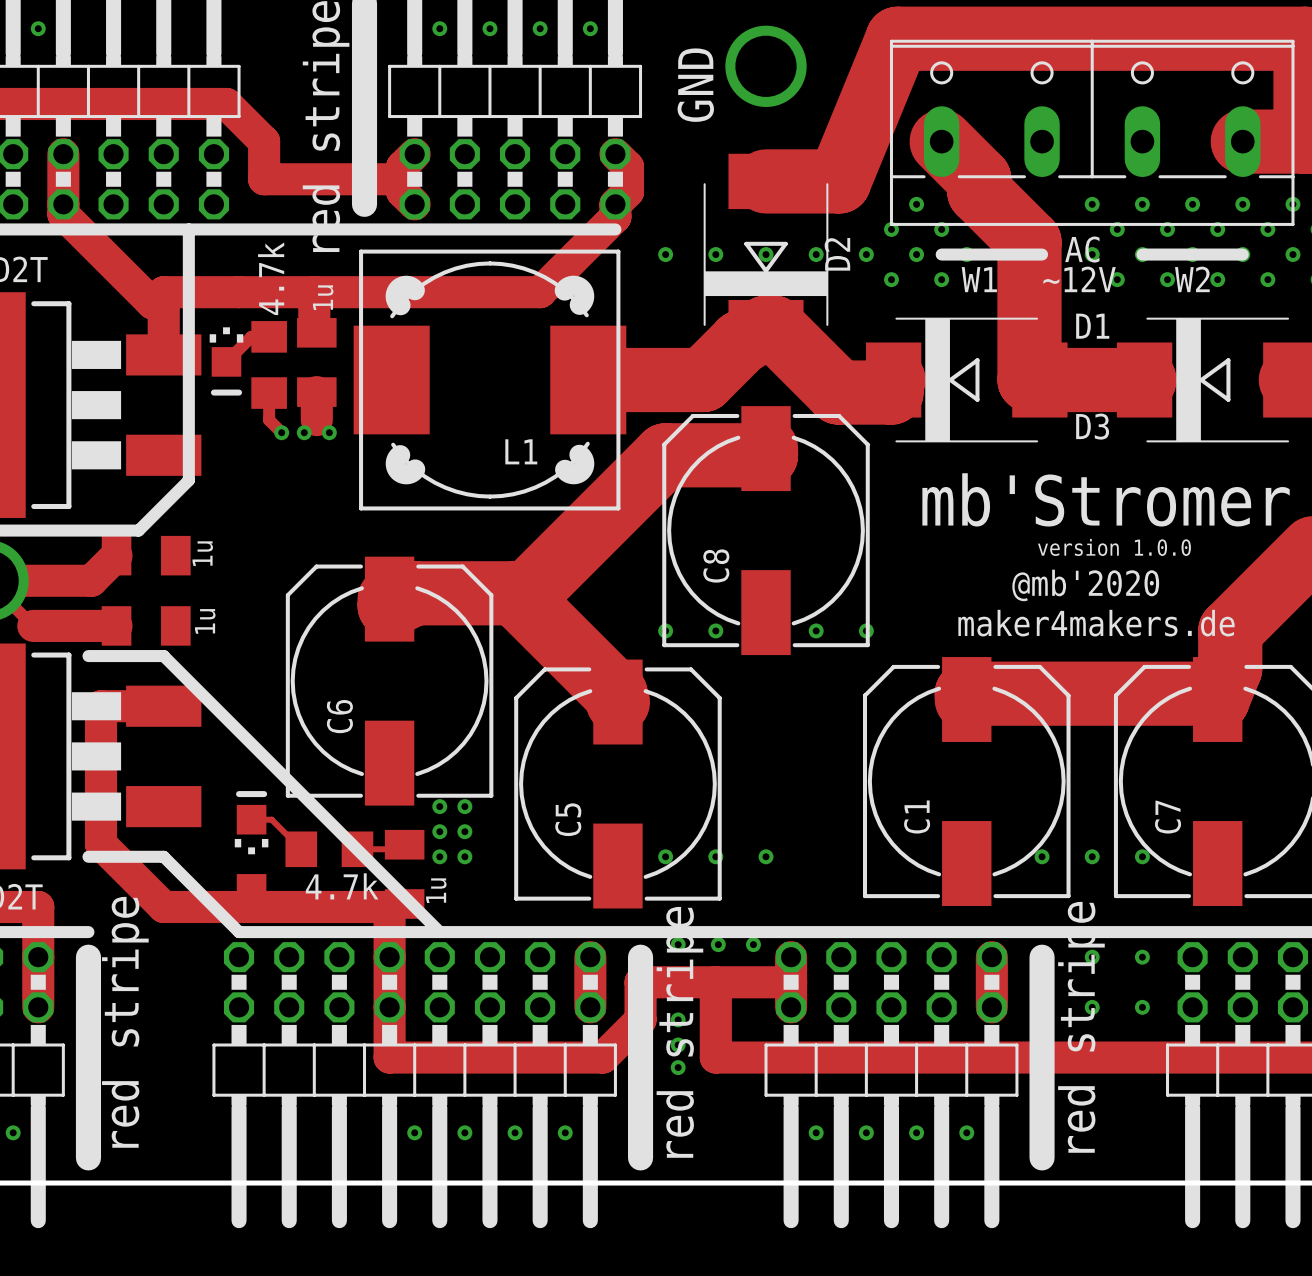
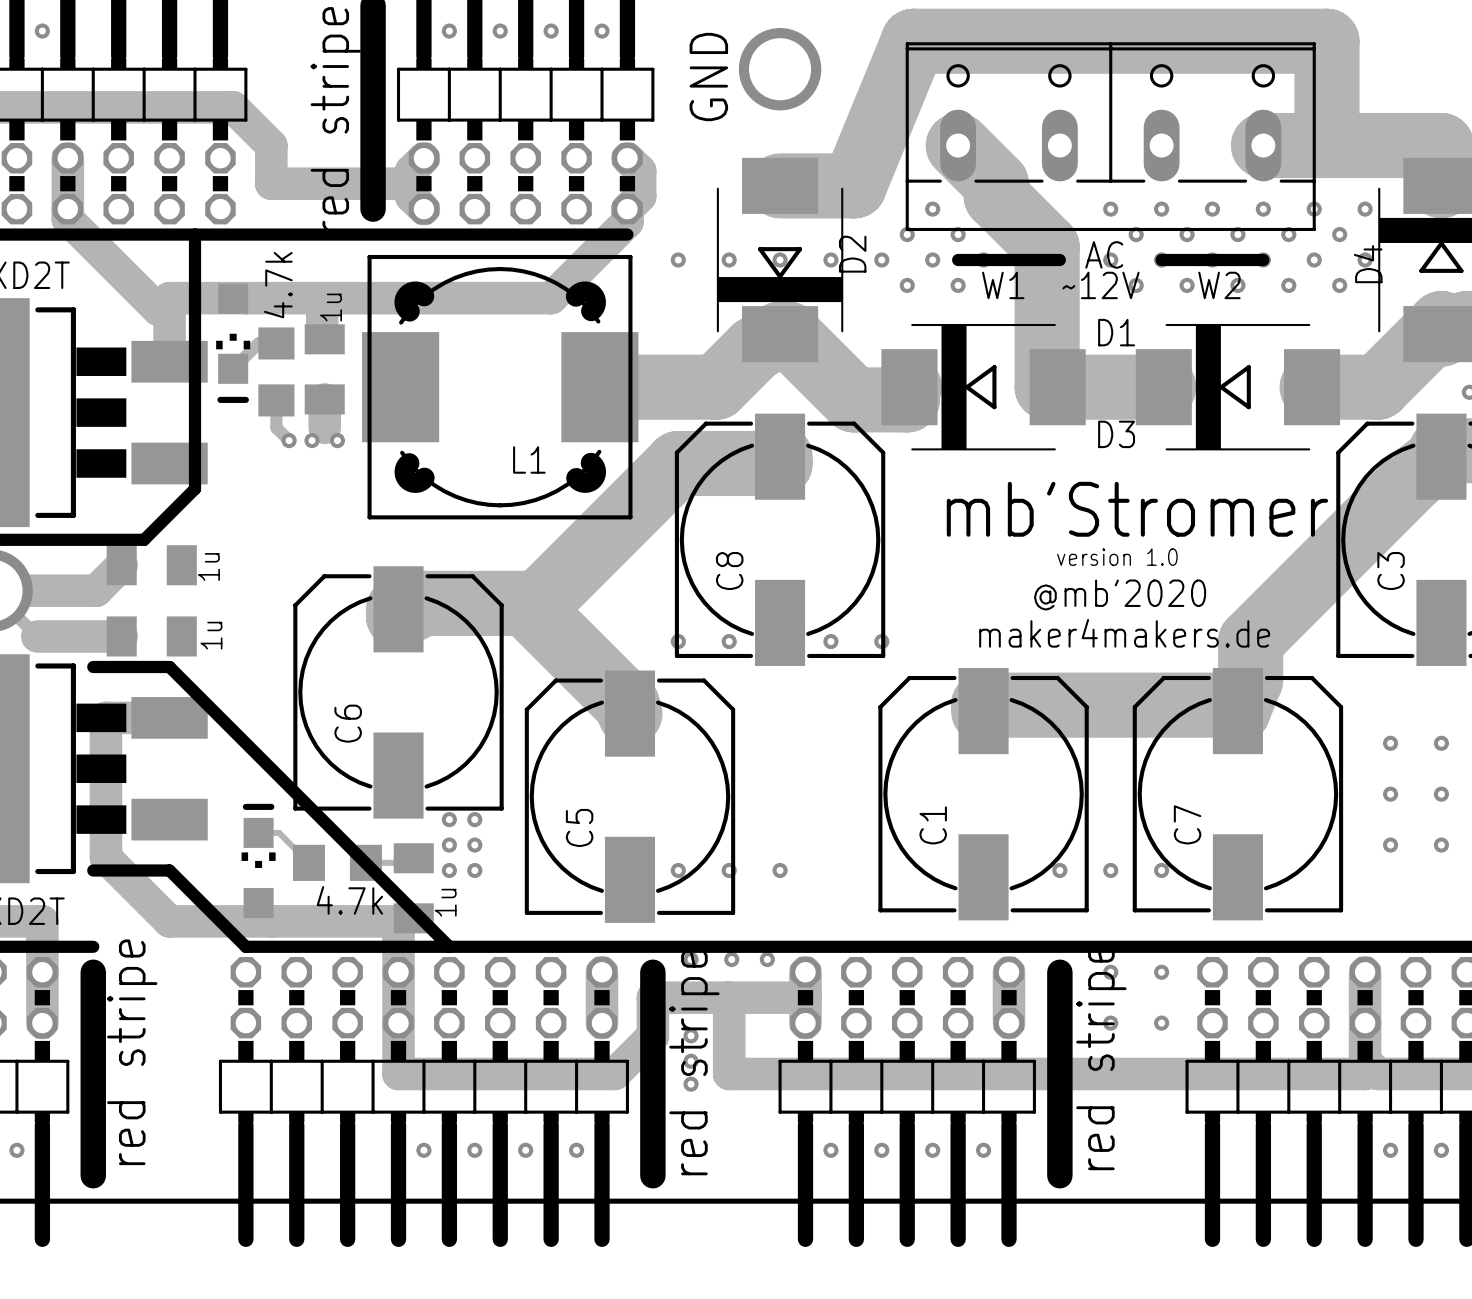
text: version 1.0.0 (1114, 547) -> version 1.0 (1117, 557)

